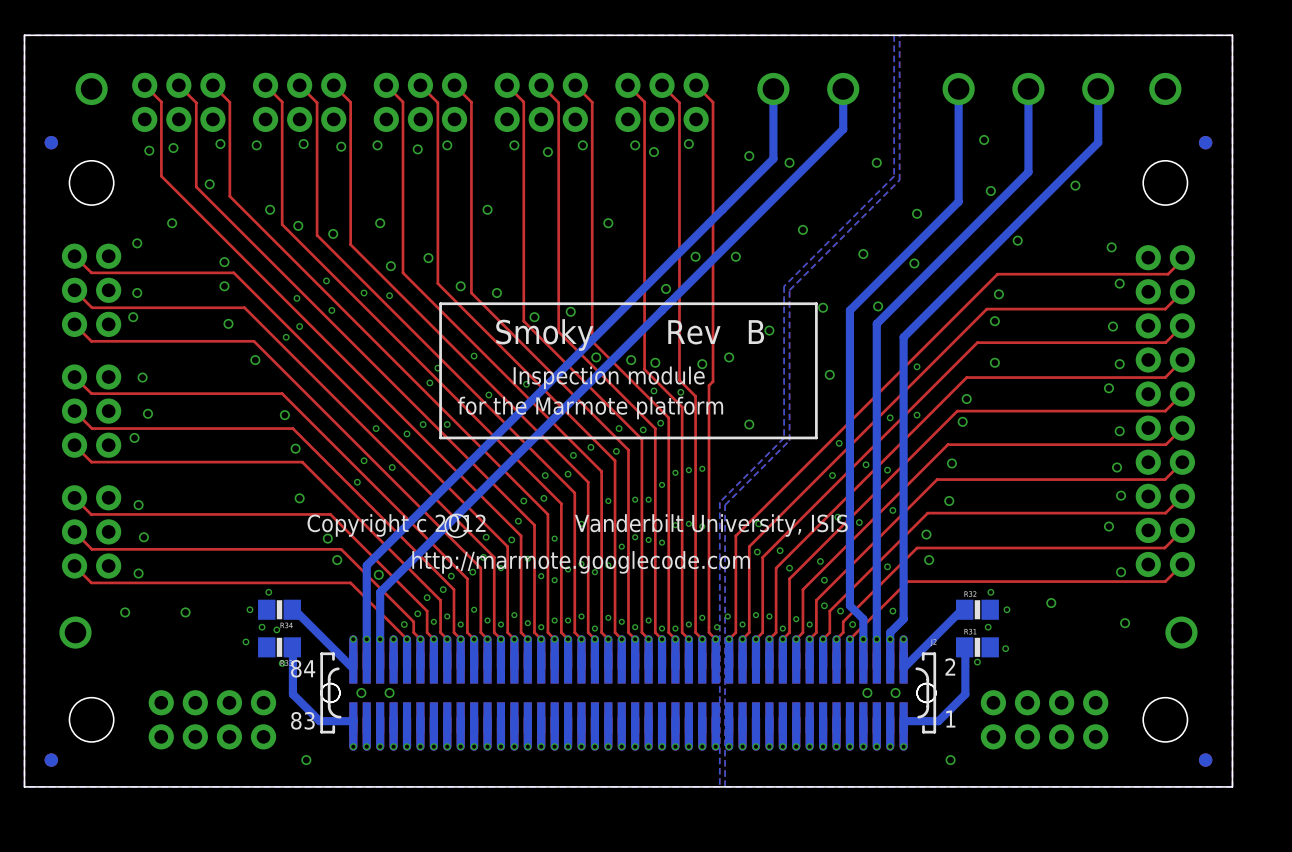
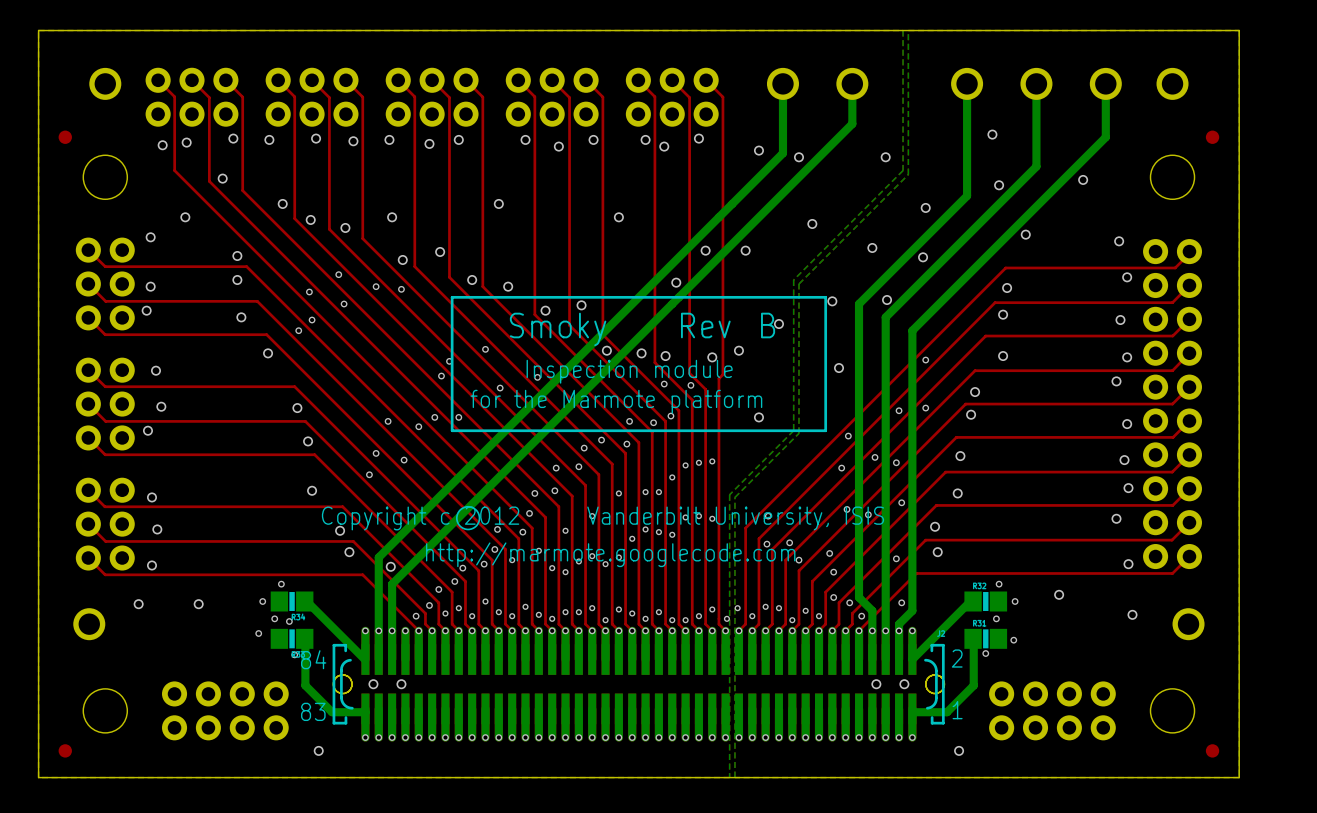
part: (51, 142) -> none
part: (1205, 142) -> none
part: (51, 760) -> none
part: (1205, 760) -> none

